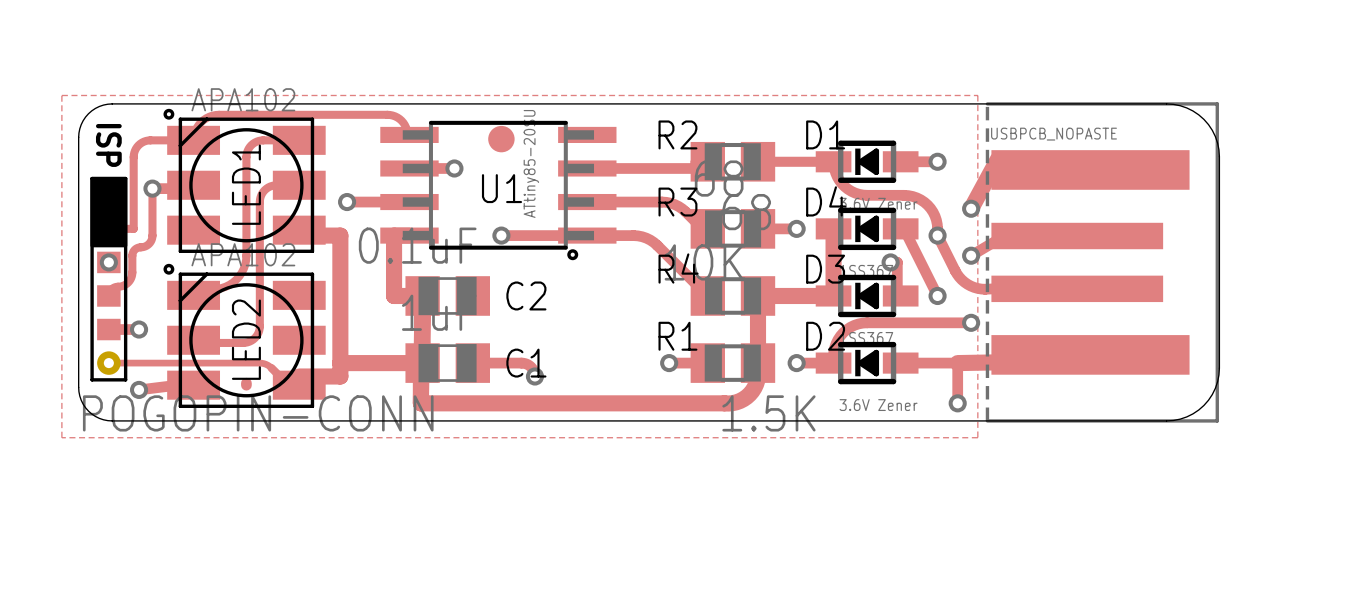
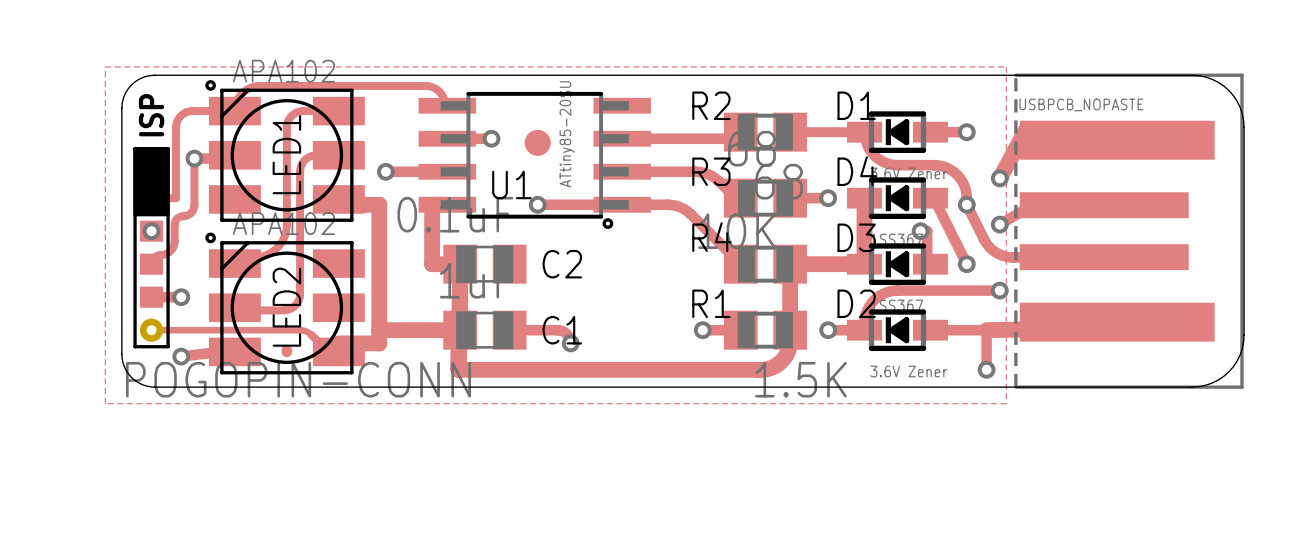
part position: (501, 139) -> (537, 142)
ISP name rotation: 0° (108, 145) -> 180° (151, 115)
U1 name position: U1 (501, 188) -> U1 (511, 184)

